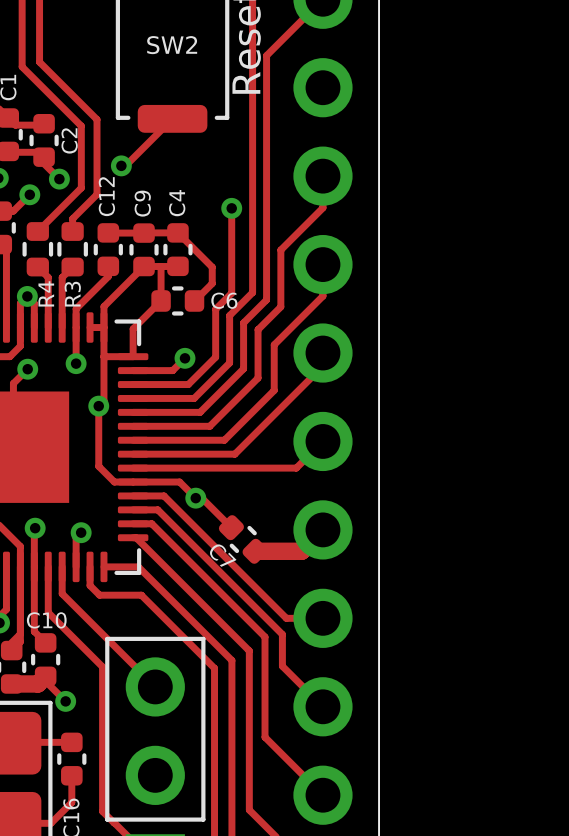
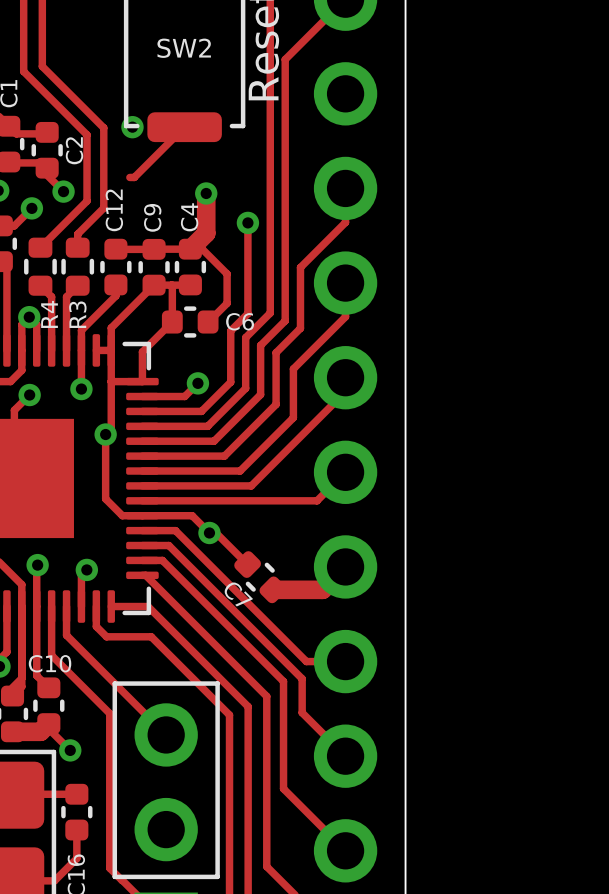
via: none -> (132, 127)
via: (121, 165) -> none
via: none -> (206, 193)
track: (177, 232) (212, 267) -> (206, 193) (206, 233) (190, 249) (202, 249) (227, 273) (227, 285)

